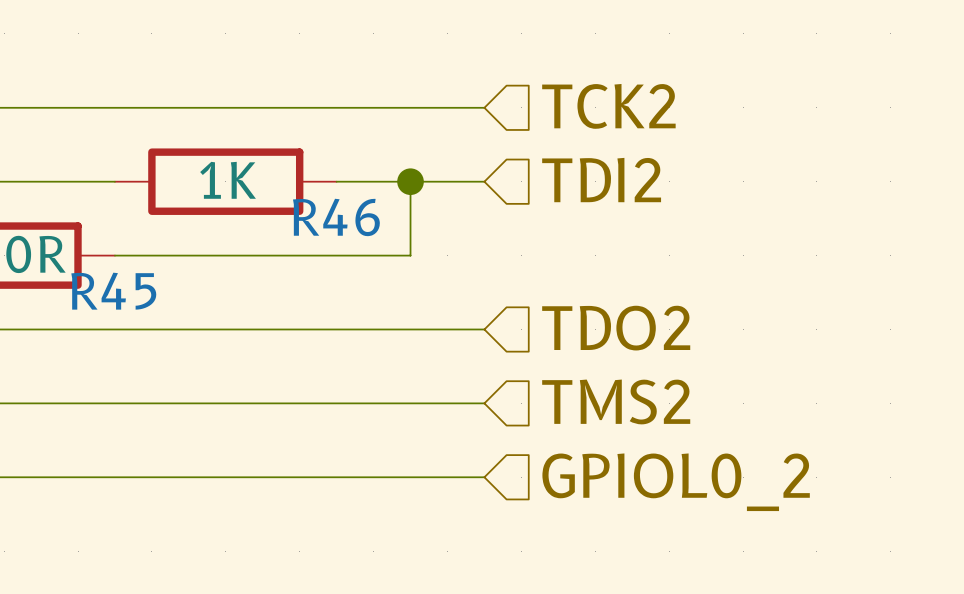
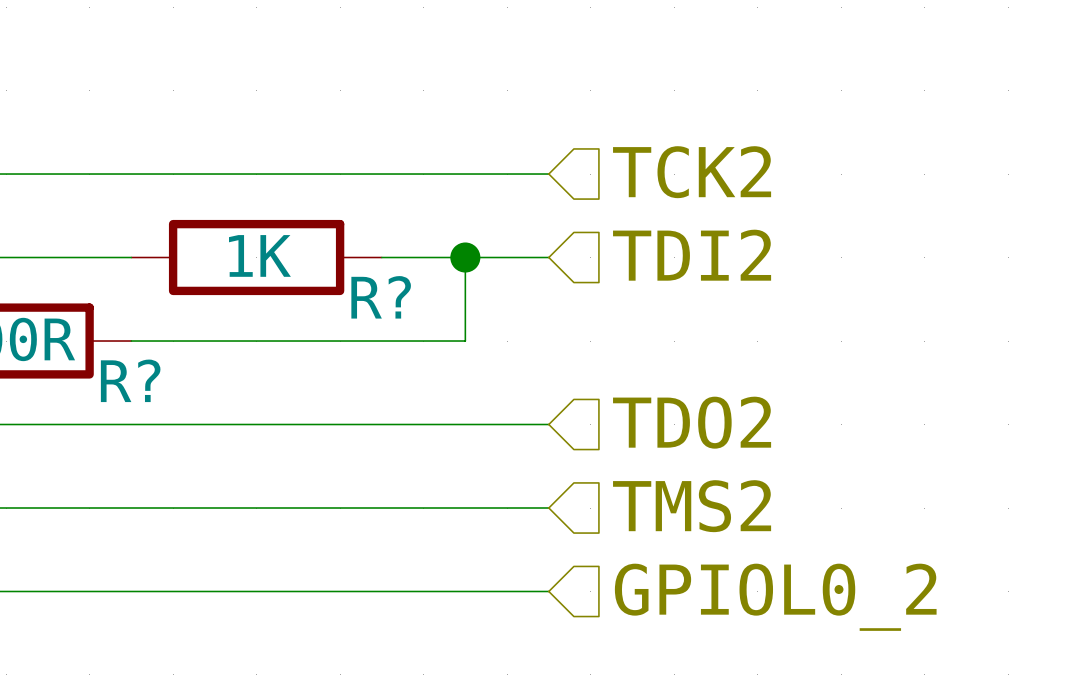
R46 name: R46 (336, 217) -> R? (381, 297)
R45 name: R45 (113, 291) -> R? (130, 380)

